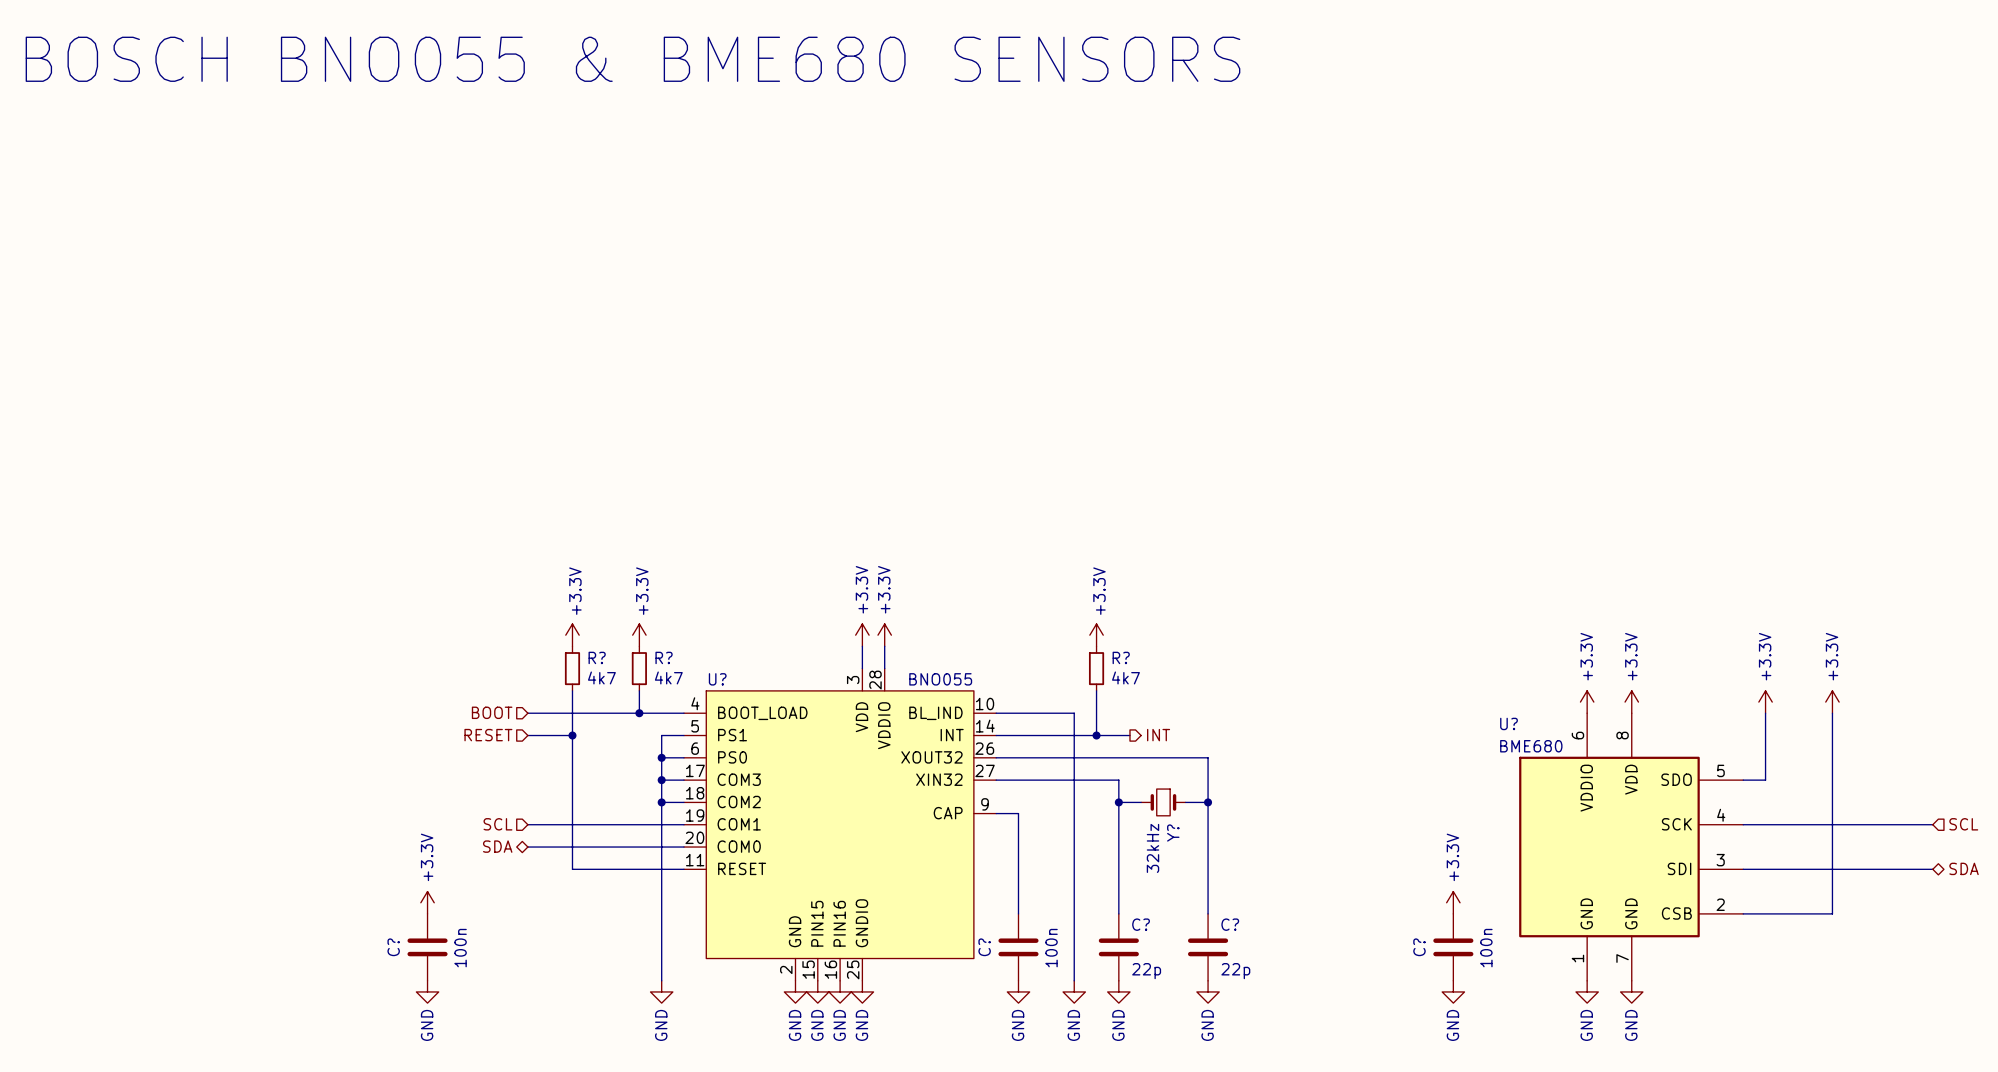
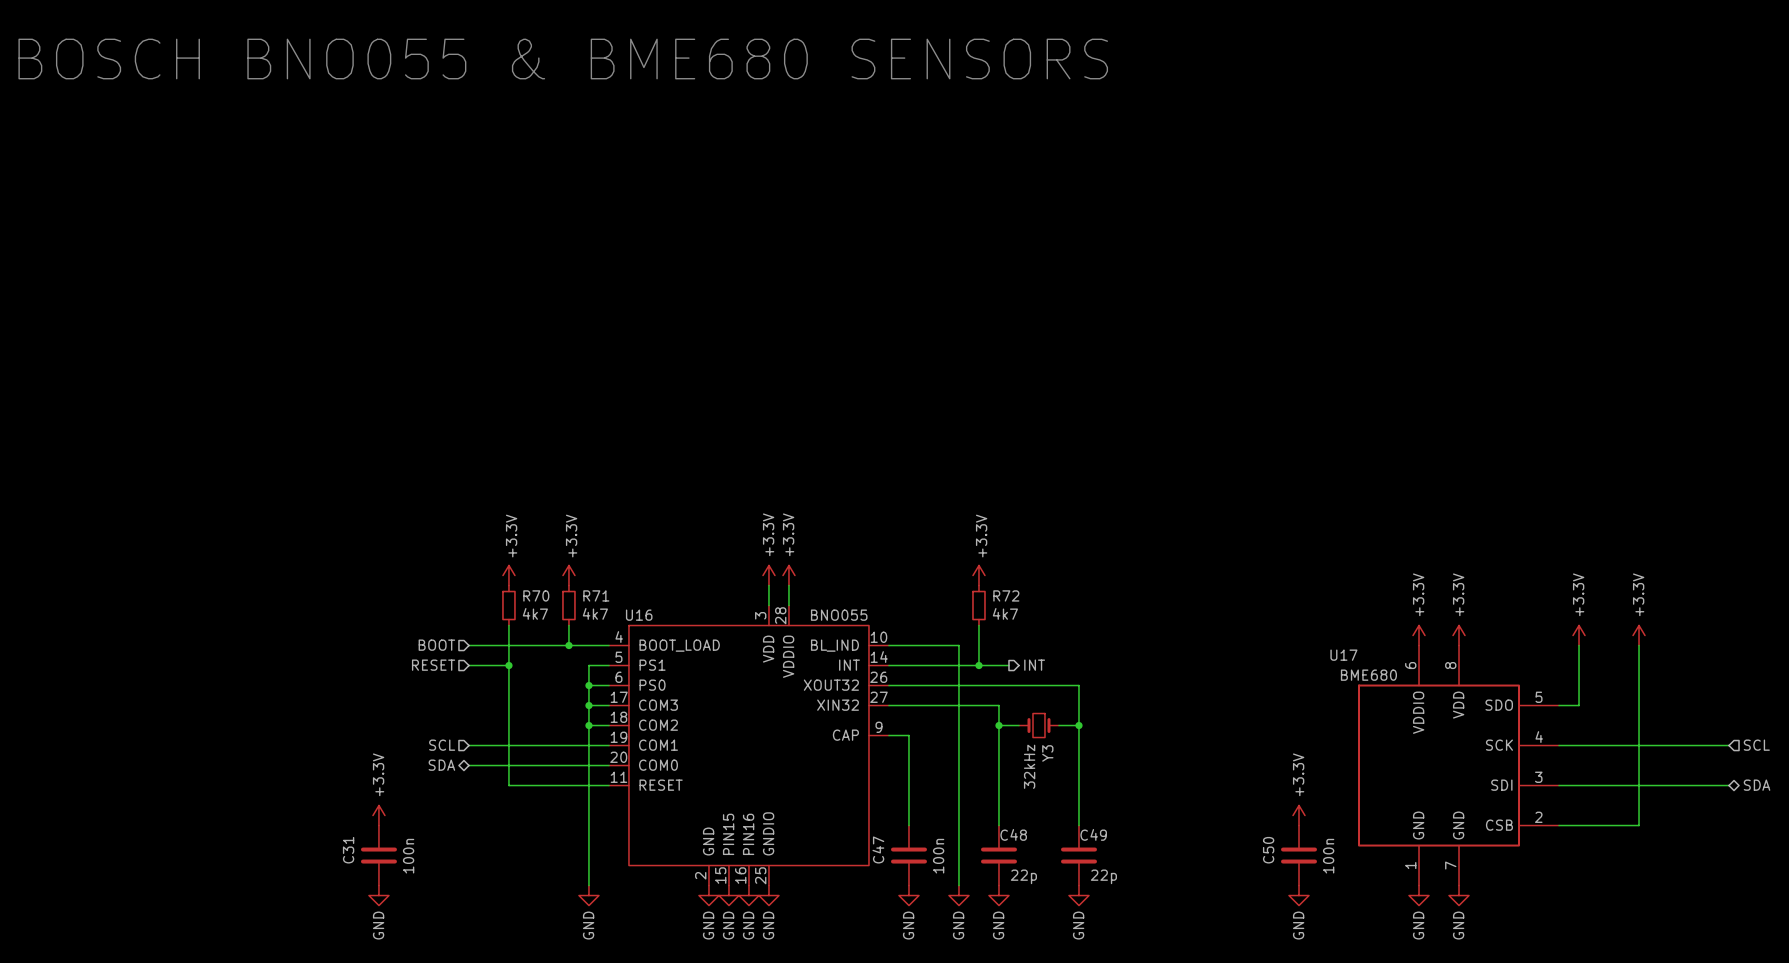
R? name: R? (597, 657) -> R70 (536, 595)
R? name: R? (664, 657) -> R71 (596, 595)
R? name: R? (1121, 657) -> R72 (1006, 595)
U? name: U? (717, 679) -> U16 (639, 615)
U? name: U? (1509, 723) -> U17 (1343, 655)
Y? name: Y? (1173, 833) -> Y3 (1047, 753)
C? name: C? (1141, 924) -> C48 (1013, 834)
C? name: C? (1230, 924) -> C49 (1093, 834)
C? name: C? (393, 947) -> C31 (348, 850)
C? name: C? (984, 947) -> C47 (878, 849)
C? name: C? (1419, 947) -> C50 (1268, 850)

